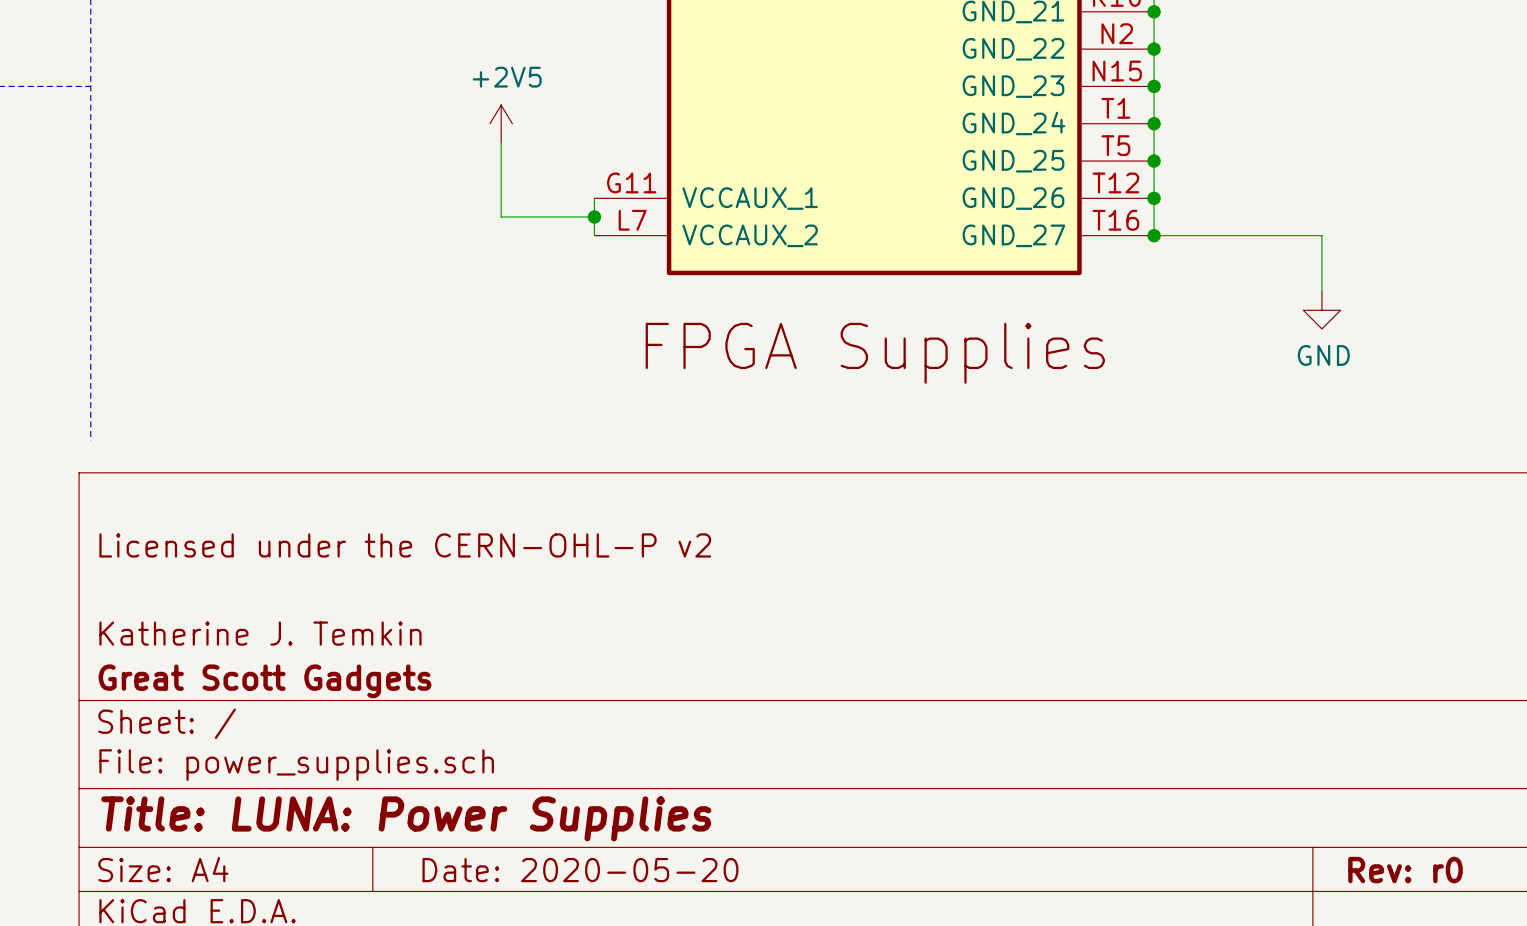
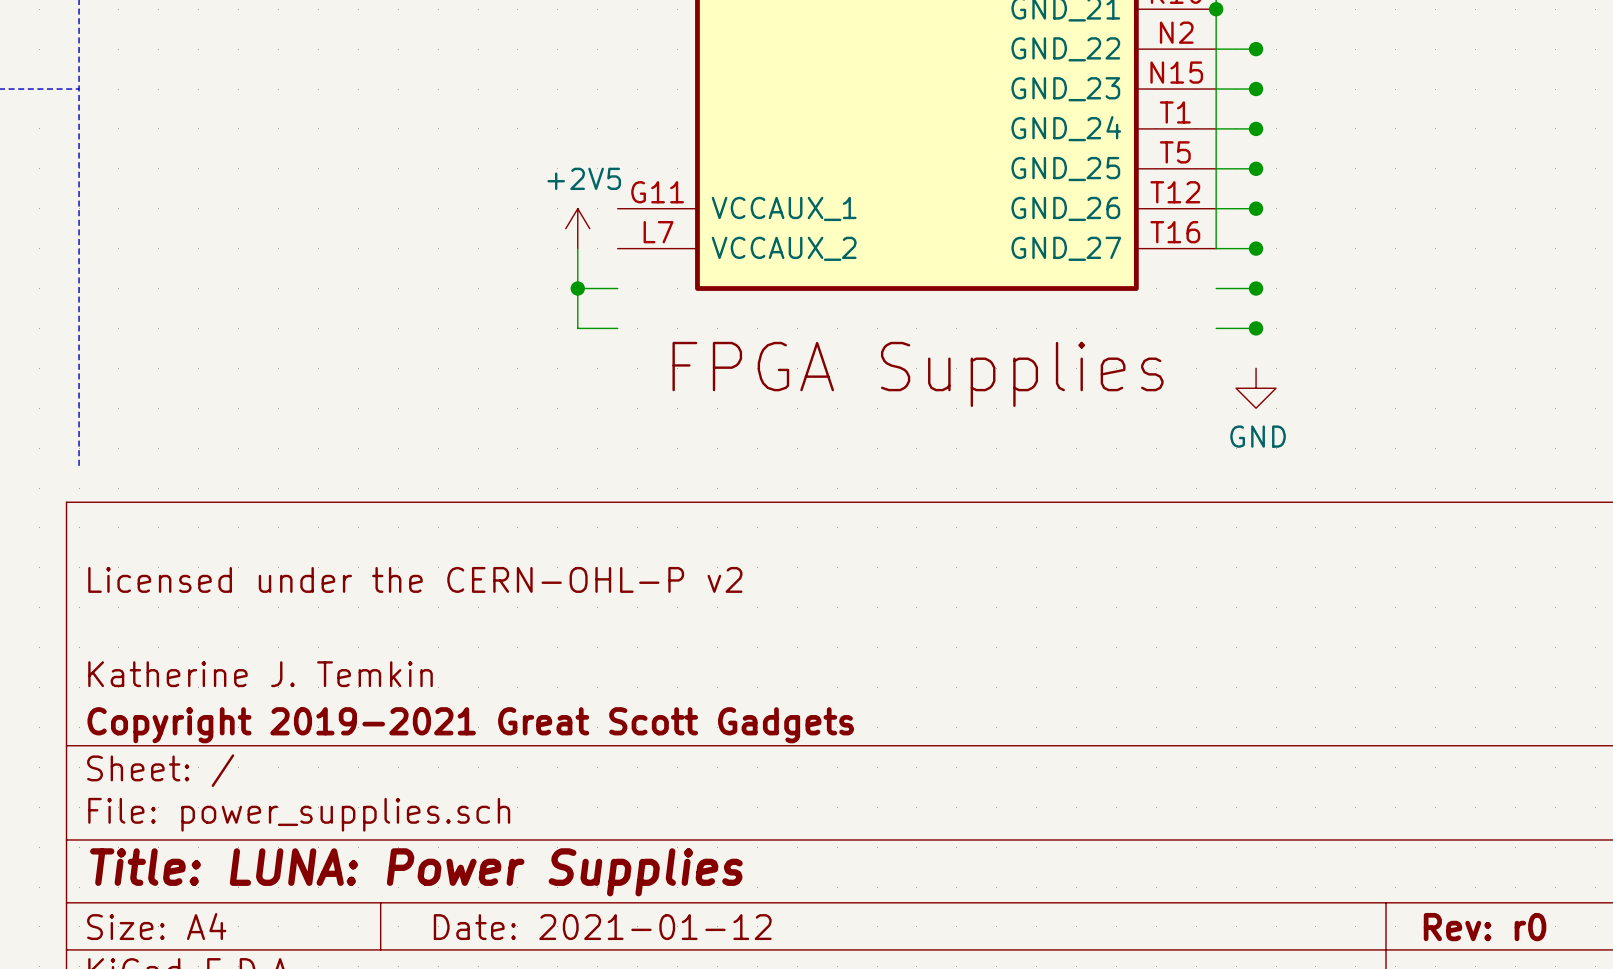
wire: none -> (1216, 49) (1256, 49)
junction: (1154, 49) -> none
junction: none -> (1256, 49)
wire: none -> (1216, 89) (1256, 89)
junction: (1154, 86) -> none
junction: none -> (1256, 89)
power symbol position: +2V5 (501, 123) -> +2V5 (577, 228)
wire: none -> (1216, 128) (1256, 128)
junction: (1154, 123) -> none
junction: none -> (1256, 128)
wire: (501, 142) (501, 217) (594, 217) -> none
wire: none -> (1216, 168) (1256, 168)
junction: (1154, 161) -> none
junction: none -> (1256, 168)
wire: (594, 198) (594, 235) -> none
wire: none -> (1216, 208) (1256, 208)
junction: (1154, 198) -> none
junction: none -> (1256, 208)
junction position: (594, 217) -> (577, 288)
wire: none -> (577, 248) (577, 328) (617, 328)
junction: (1154, 235) -> none
wire: (1191, 235) (1321, 235) (1321, 291) -> none
junction: none -> (1256, 248)
wire: none -> (577, 288) (617, 288)
wire: none -> (1216, 288) (1256, 288)
junction: none -> (1256, 288)
wire: none -> (1216, 328) (1256, 328)
junction: none -> (1256, 328)
power symbol position: GND (1321, 310) -> GND (1256, 388)
title block: Great Scott Gadgets (265, 681) -> Copyright 2019-2021 Great Scott Gadgets (470, 725)
title block: Date: 2020-05-20 (580, 870) -> Date: 2021-01-12 (602, 927)

